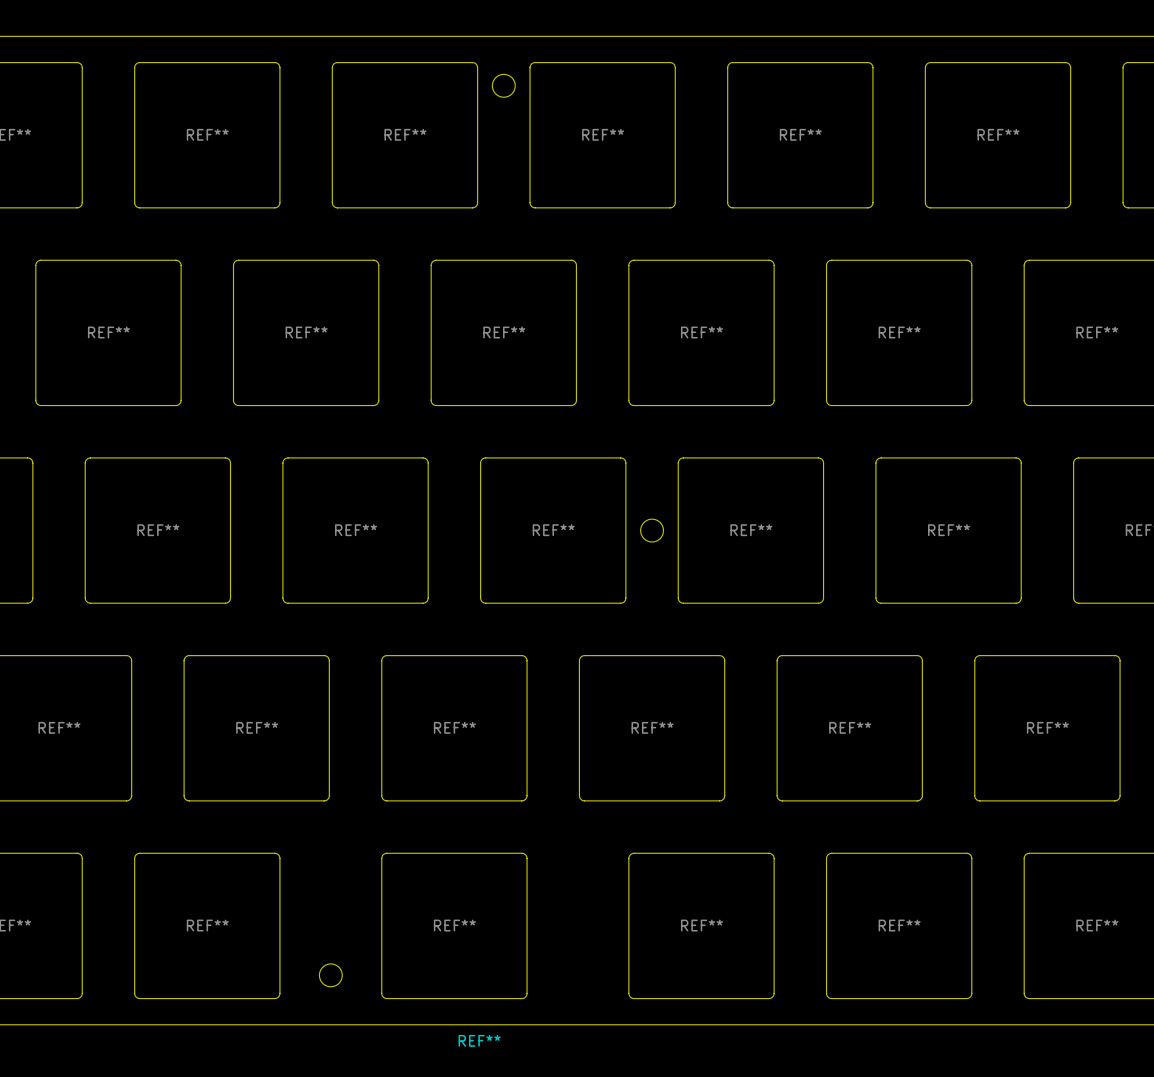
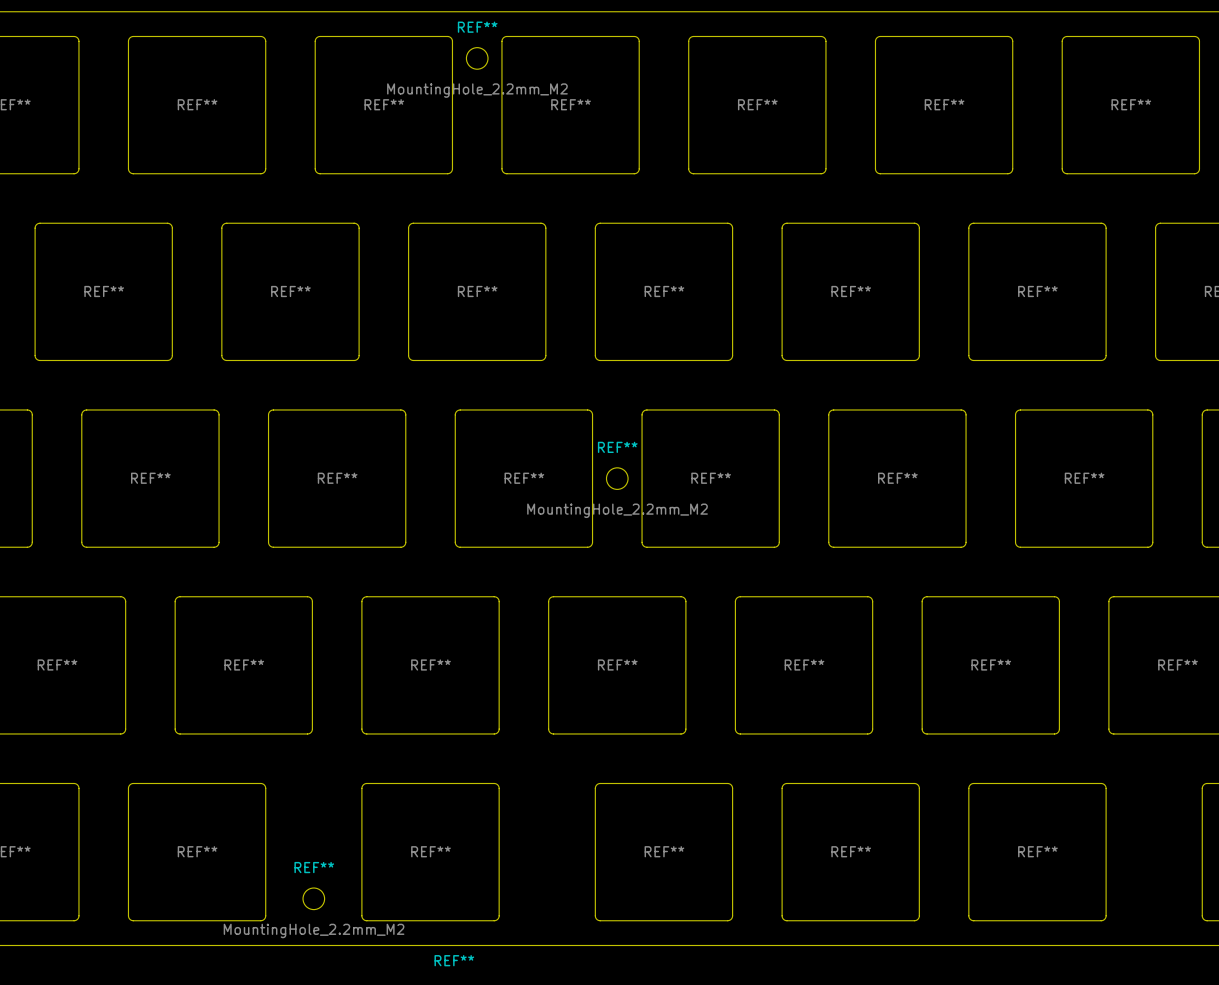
REF**: none -> MountingHole_2.2mm_M2 (477, 58)
REF**: none -> MountingHole_2.2mm_M2 (617, 478)
REF**: none -> MountingHole_2.2mm_M2 (313, 898)

